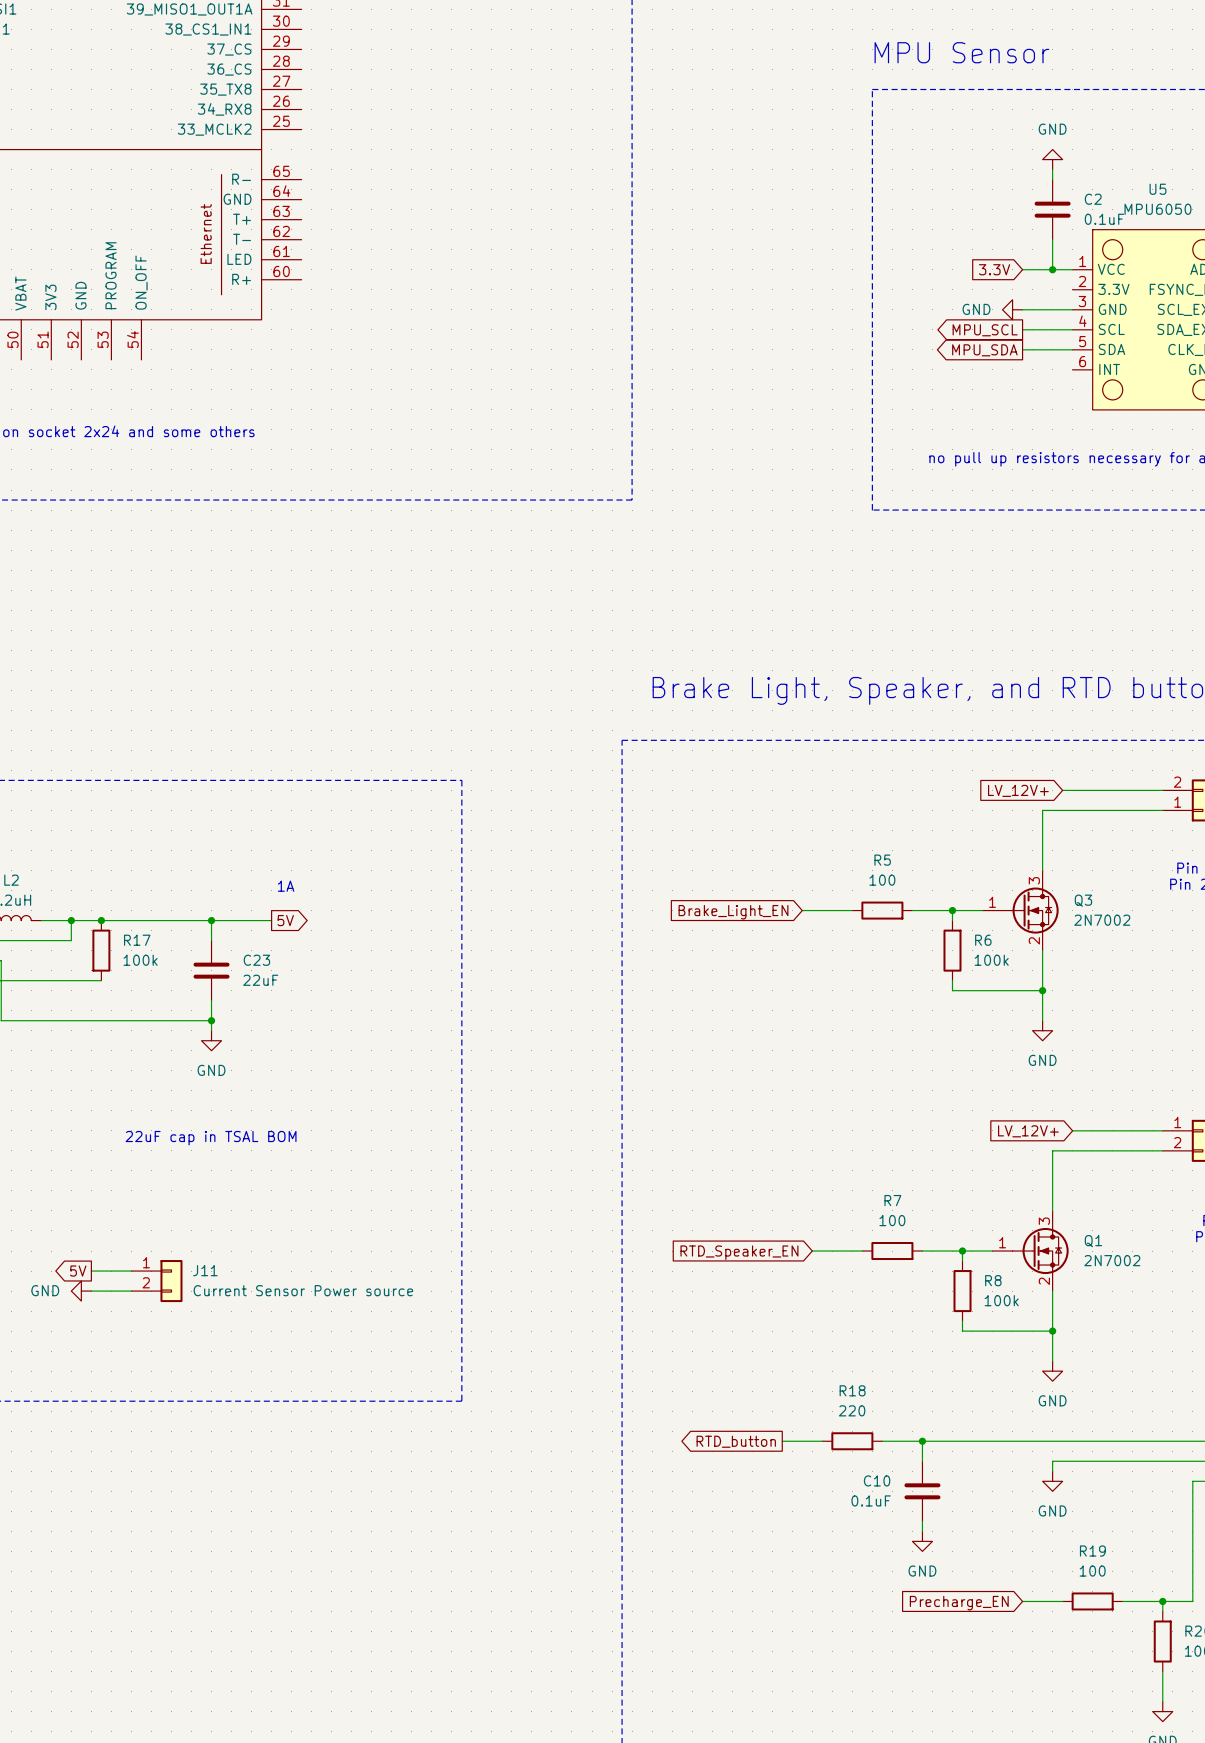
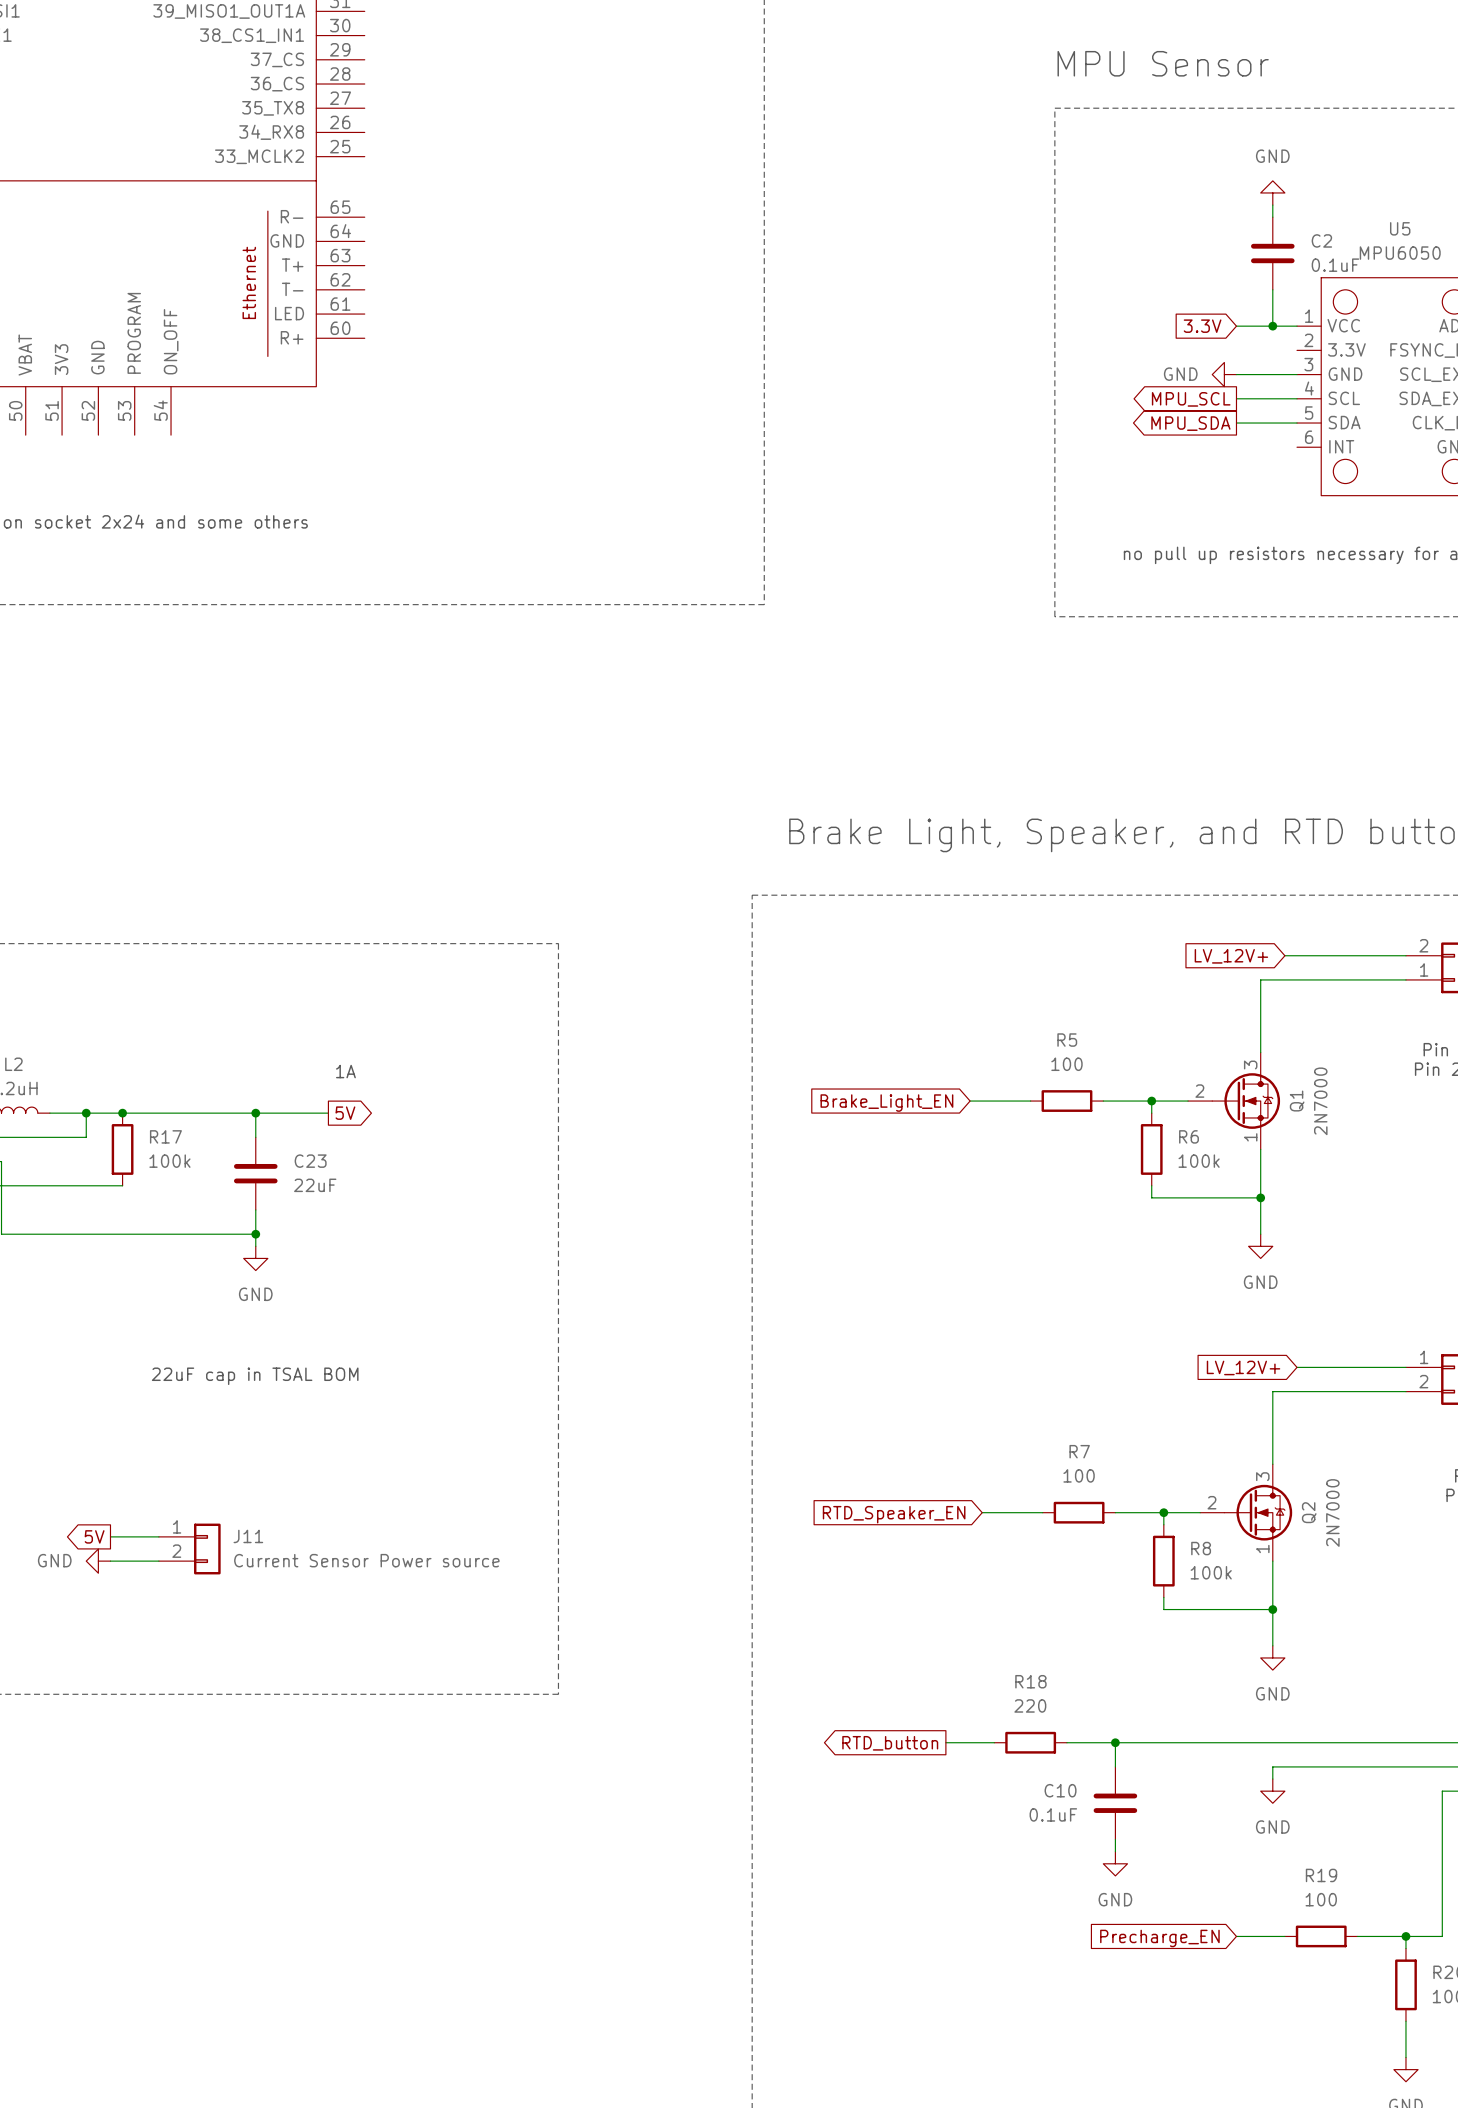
Q3: 2N7002 (1020, 910) -> none
Q1 symbol: [992, 1210, 1069, 1292] -> [1188, 1052, 1281, 1150]
Q1 name position: Q1 (1093, 1241) -> Q1 (1297, 1101)
Q2: none -> 2N7000 (1246, 1512)
Q1 value: 2N7002 (1112, 1260) -> 2N7000 (1320, 1101)

